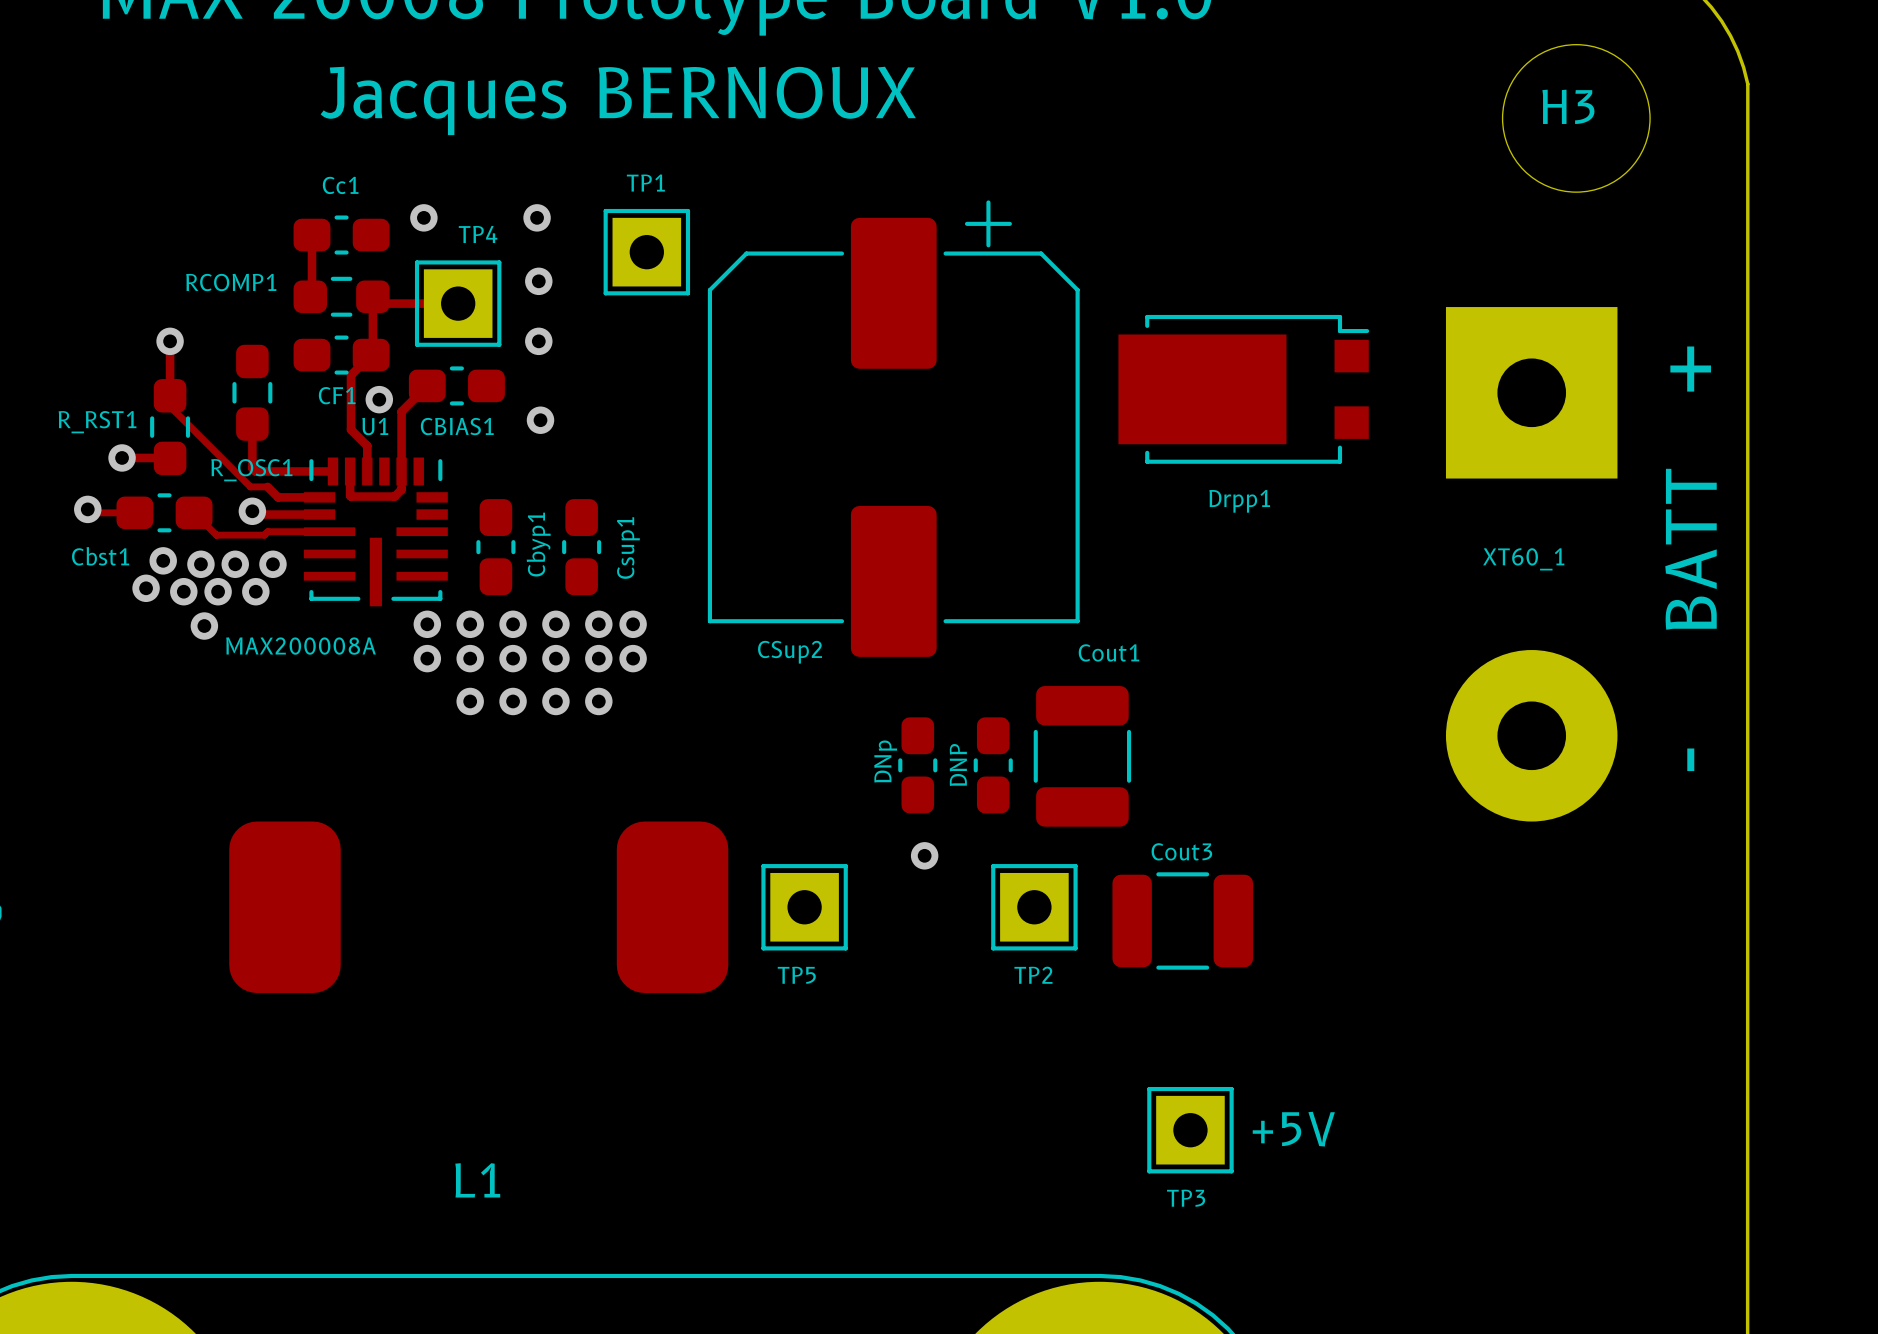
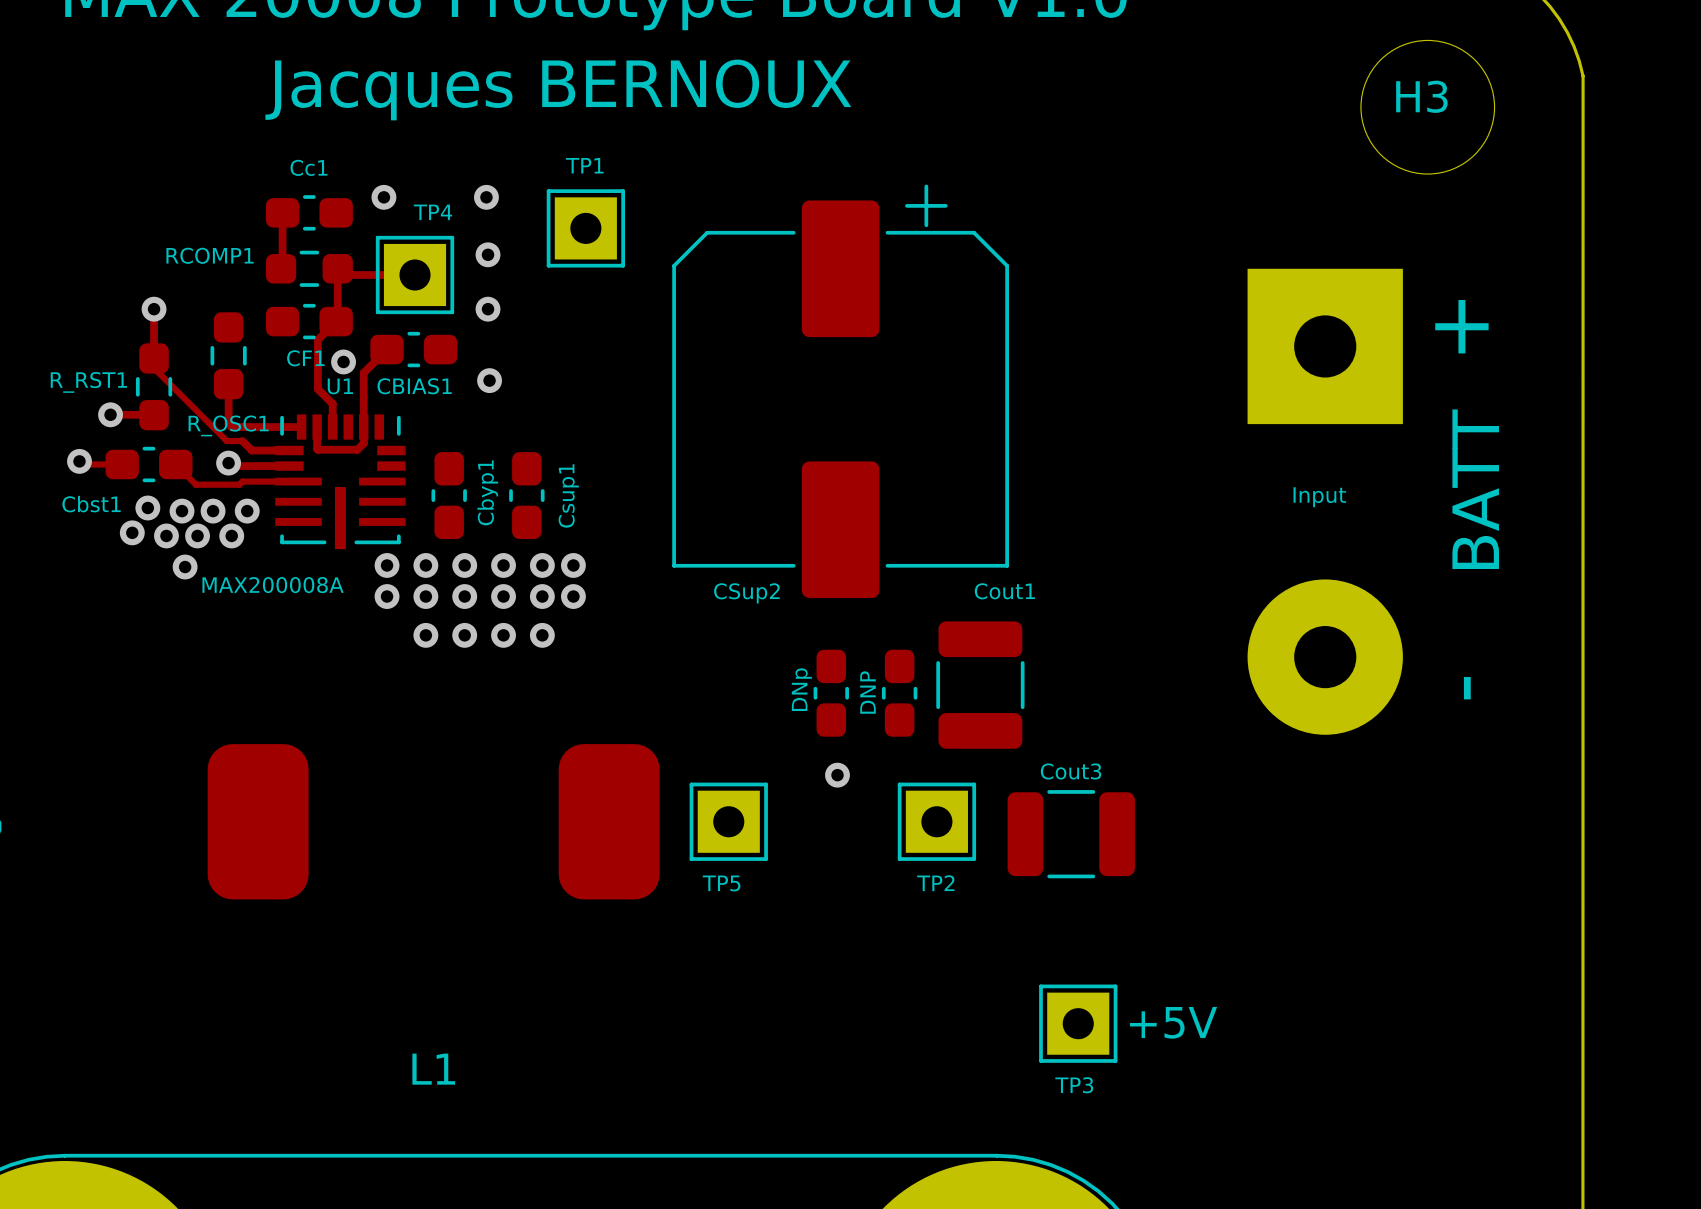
text position: + (1690, 369) -> + (1461, 326)
Drpp1: (1243, 389) -> none
CSup2 position: (893, 428) -> (840, 391)
text position: BATT (1691, 549) -> BATT (1475, 489)
Input: none -> (1325, 501)
XT60_1: (1531, 564) -> none
text position: - (1690, 759) -> - (1467, 688)

